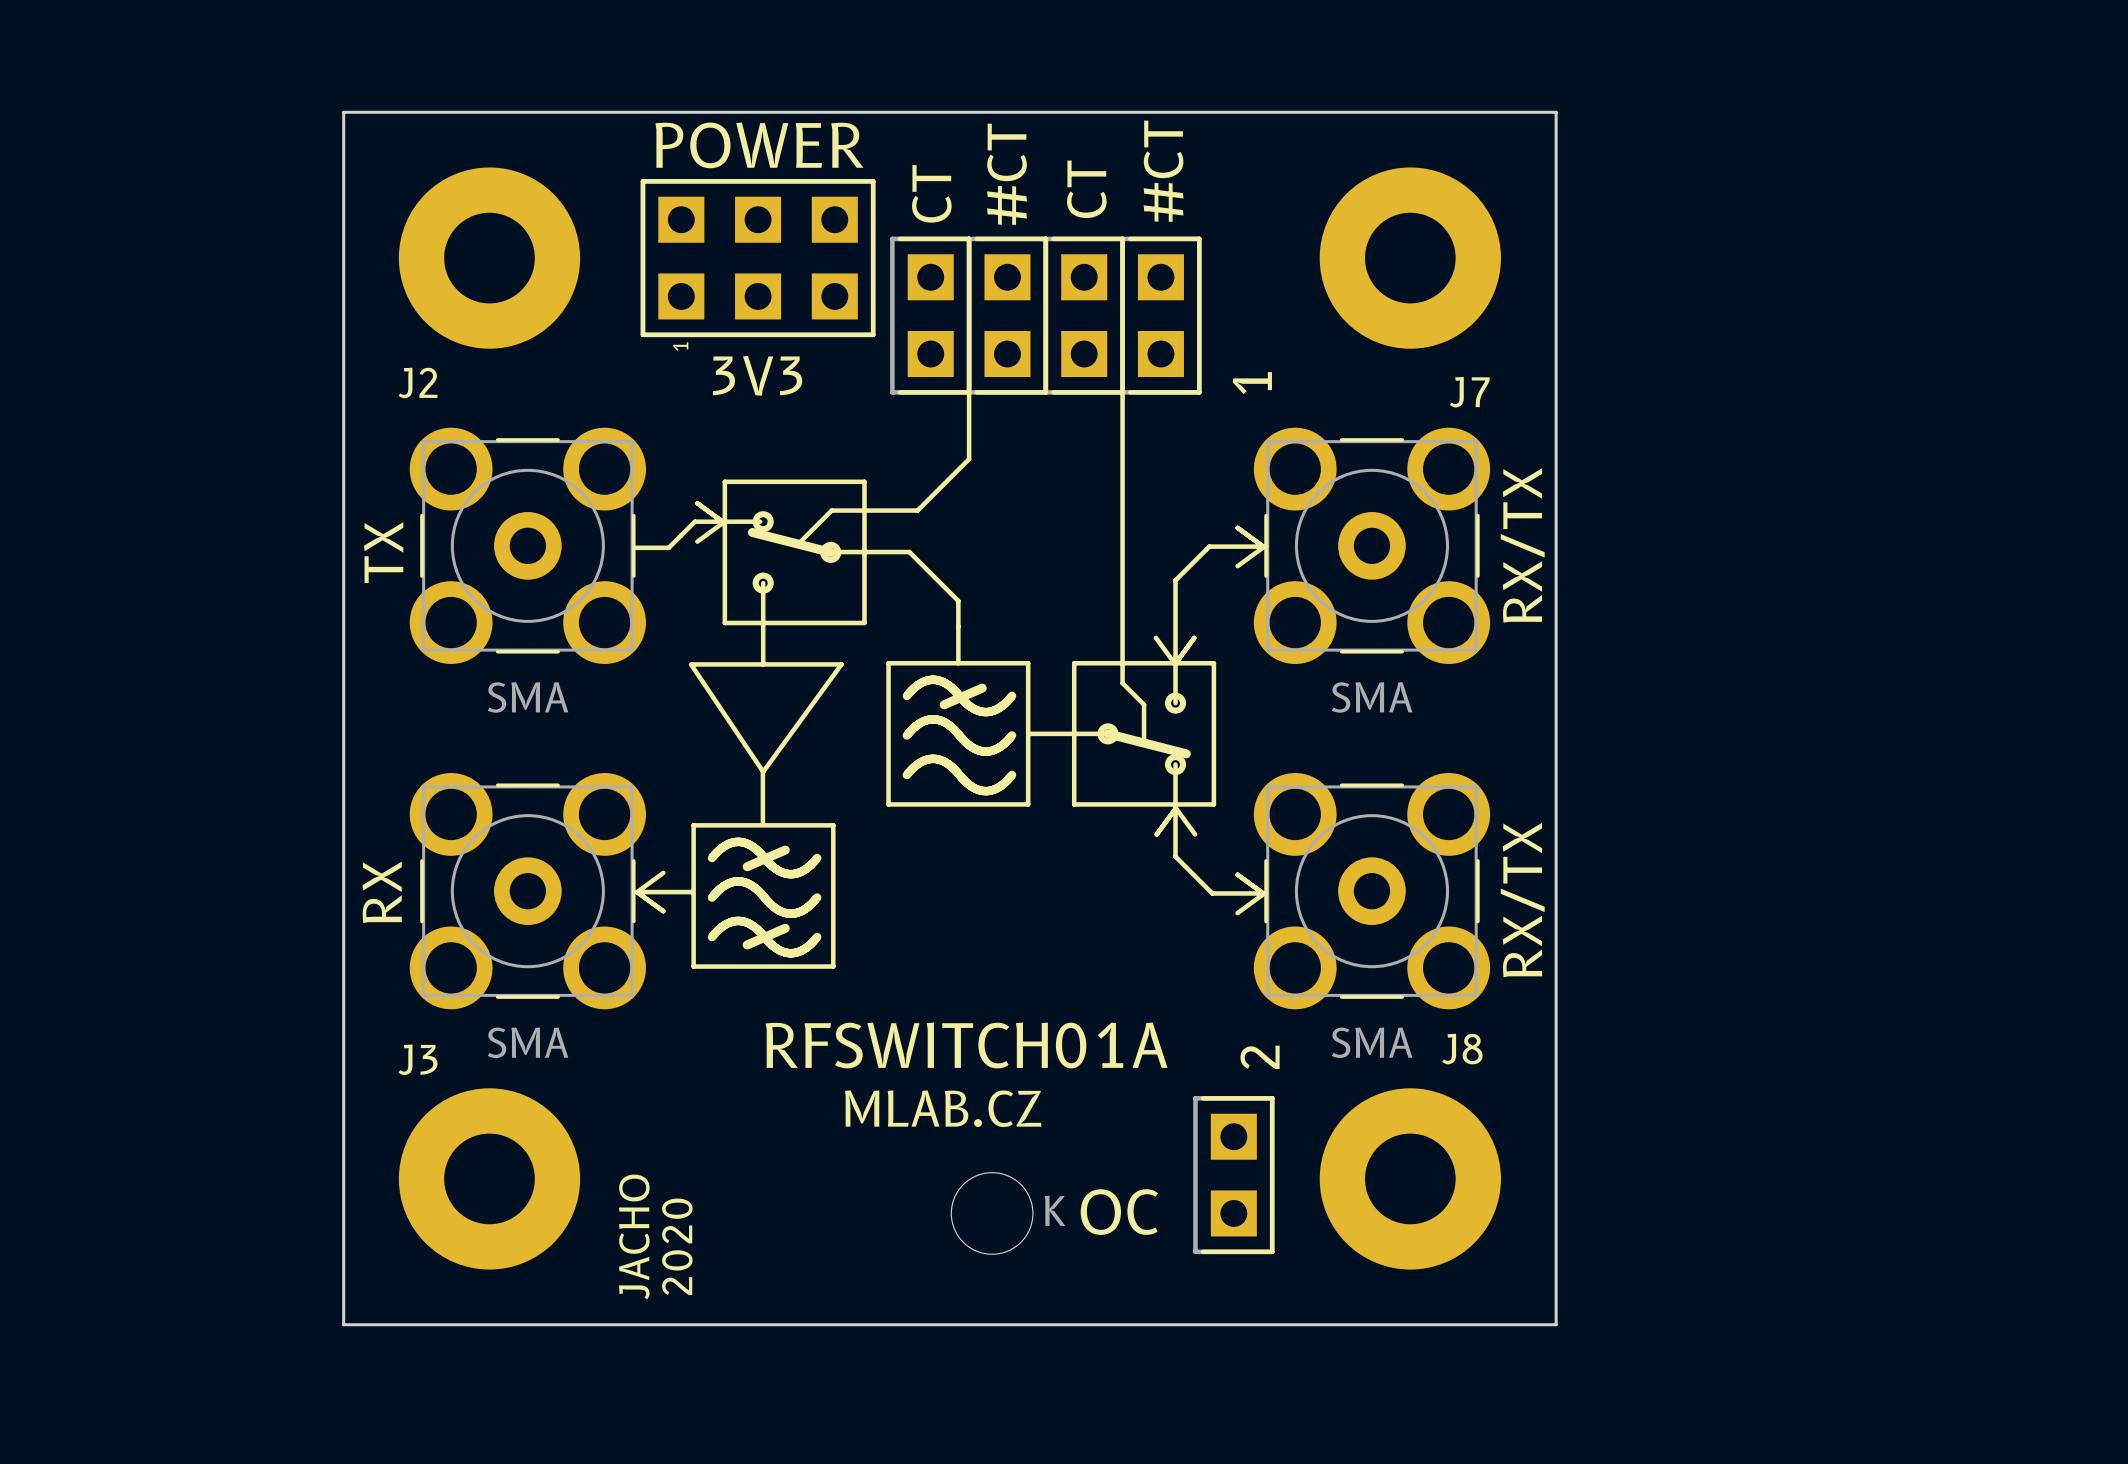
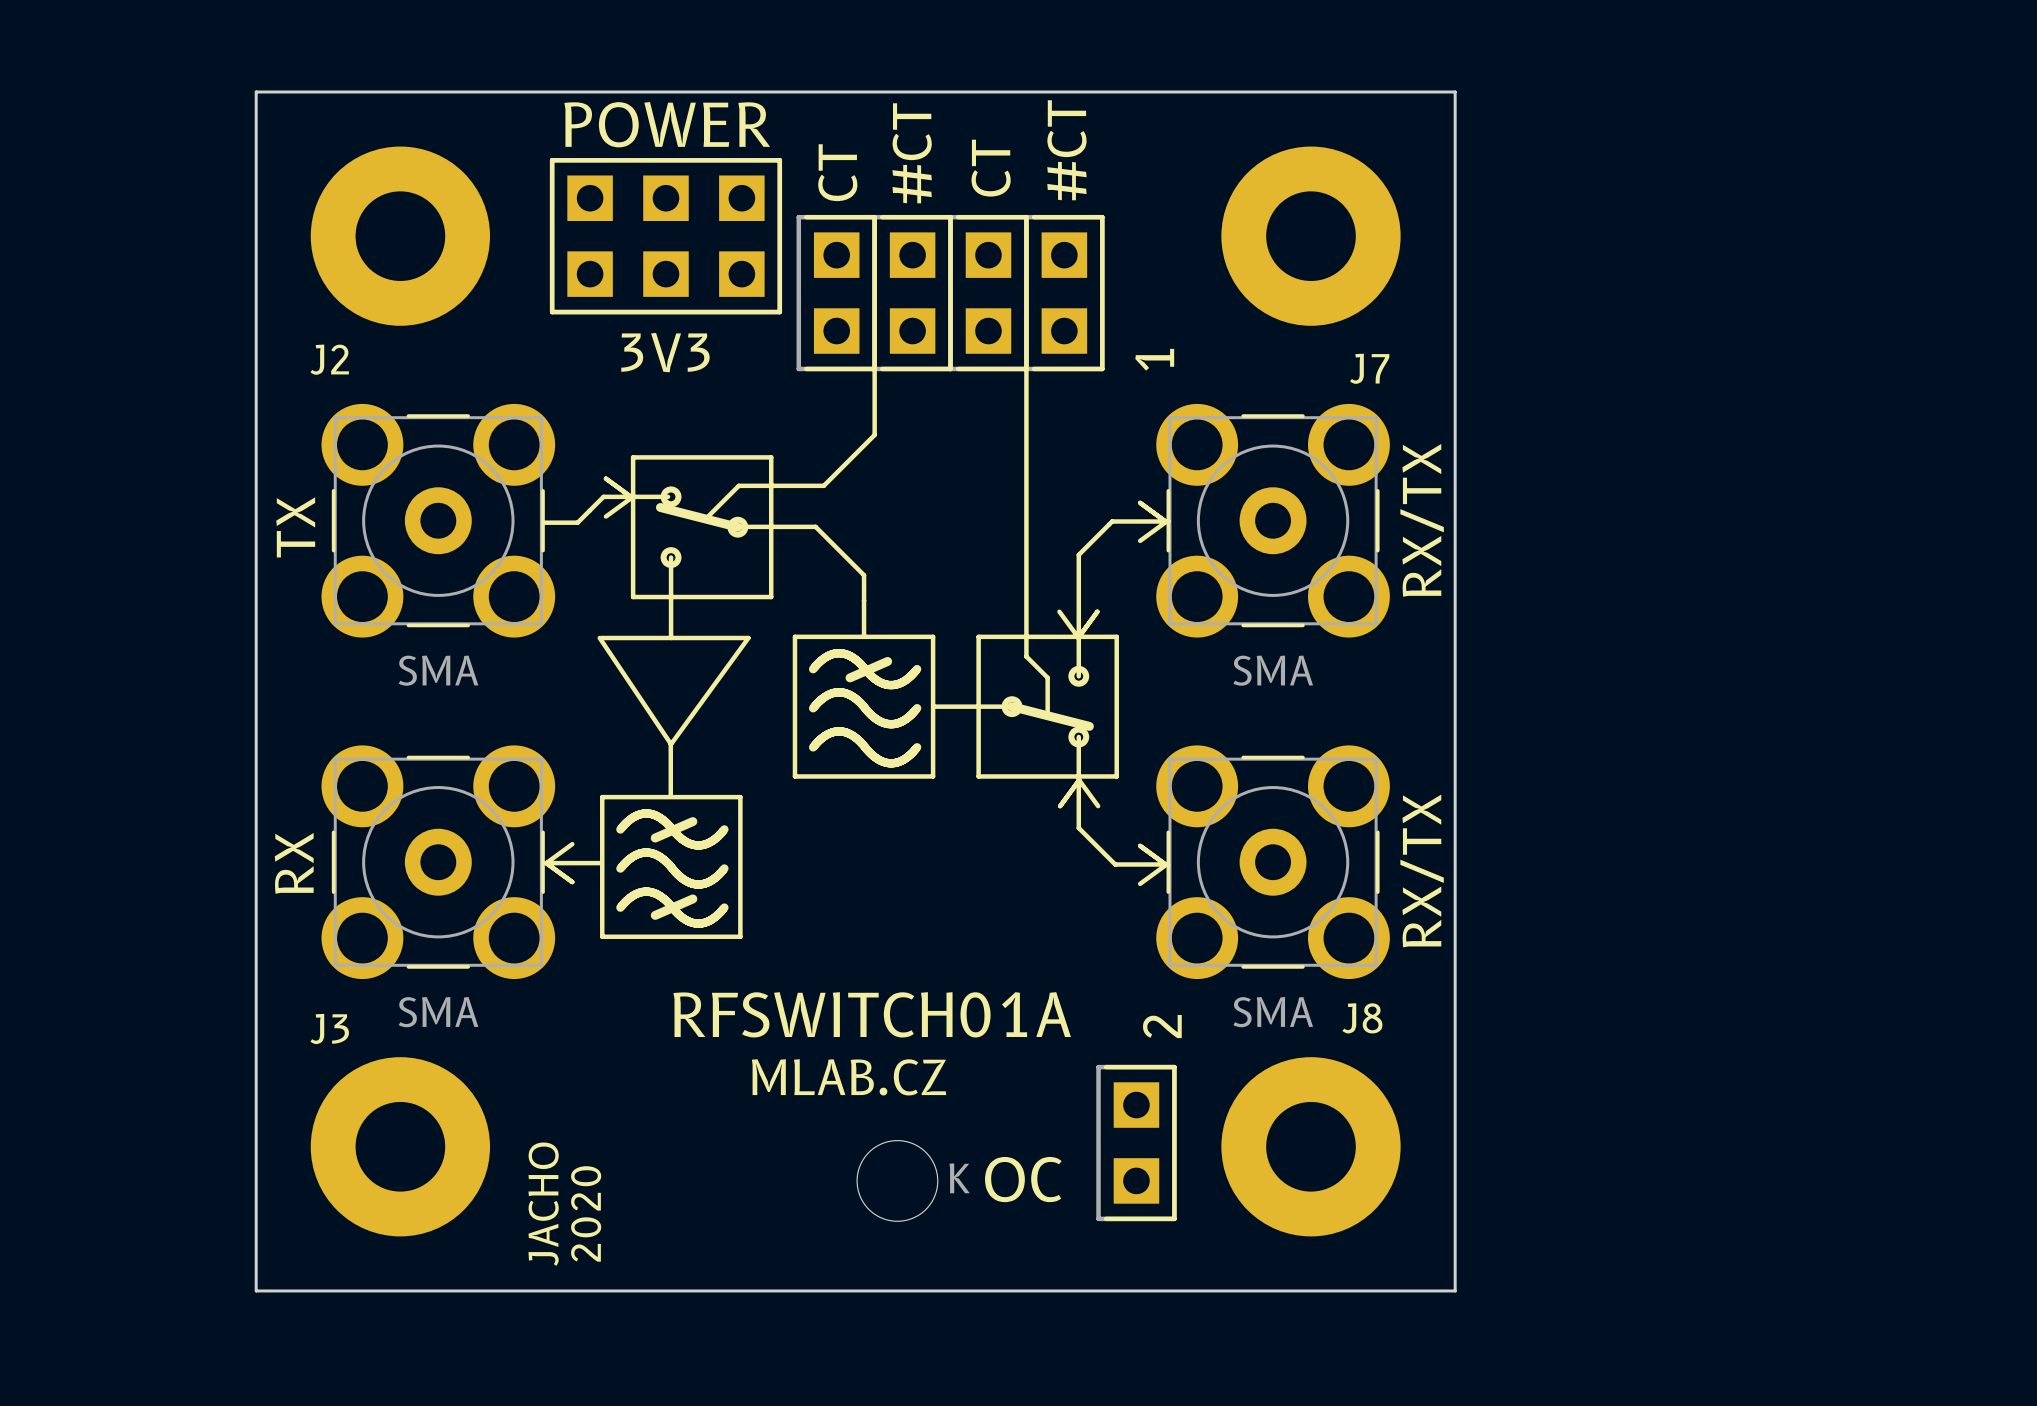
part text: 1 (680, 346) -> none

